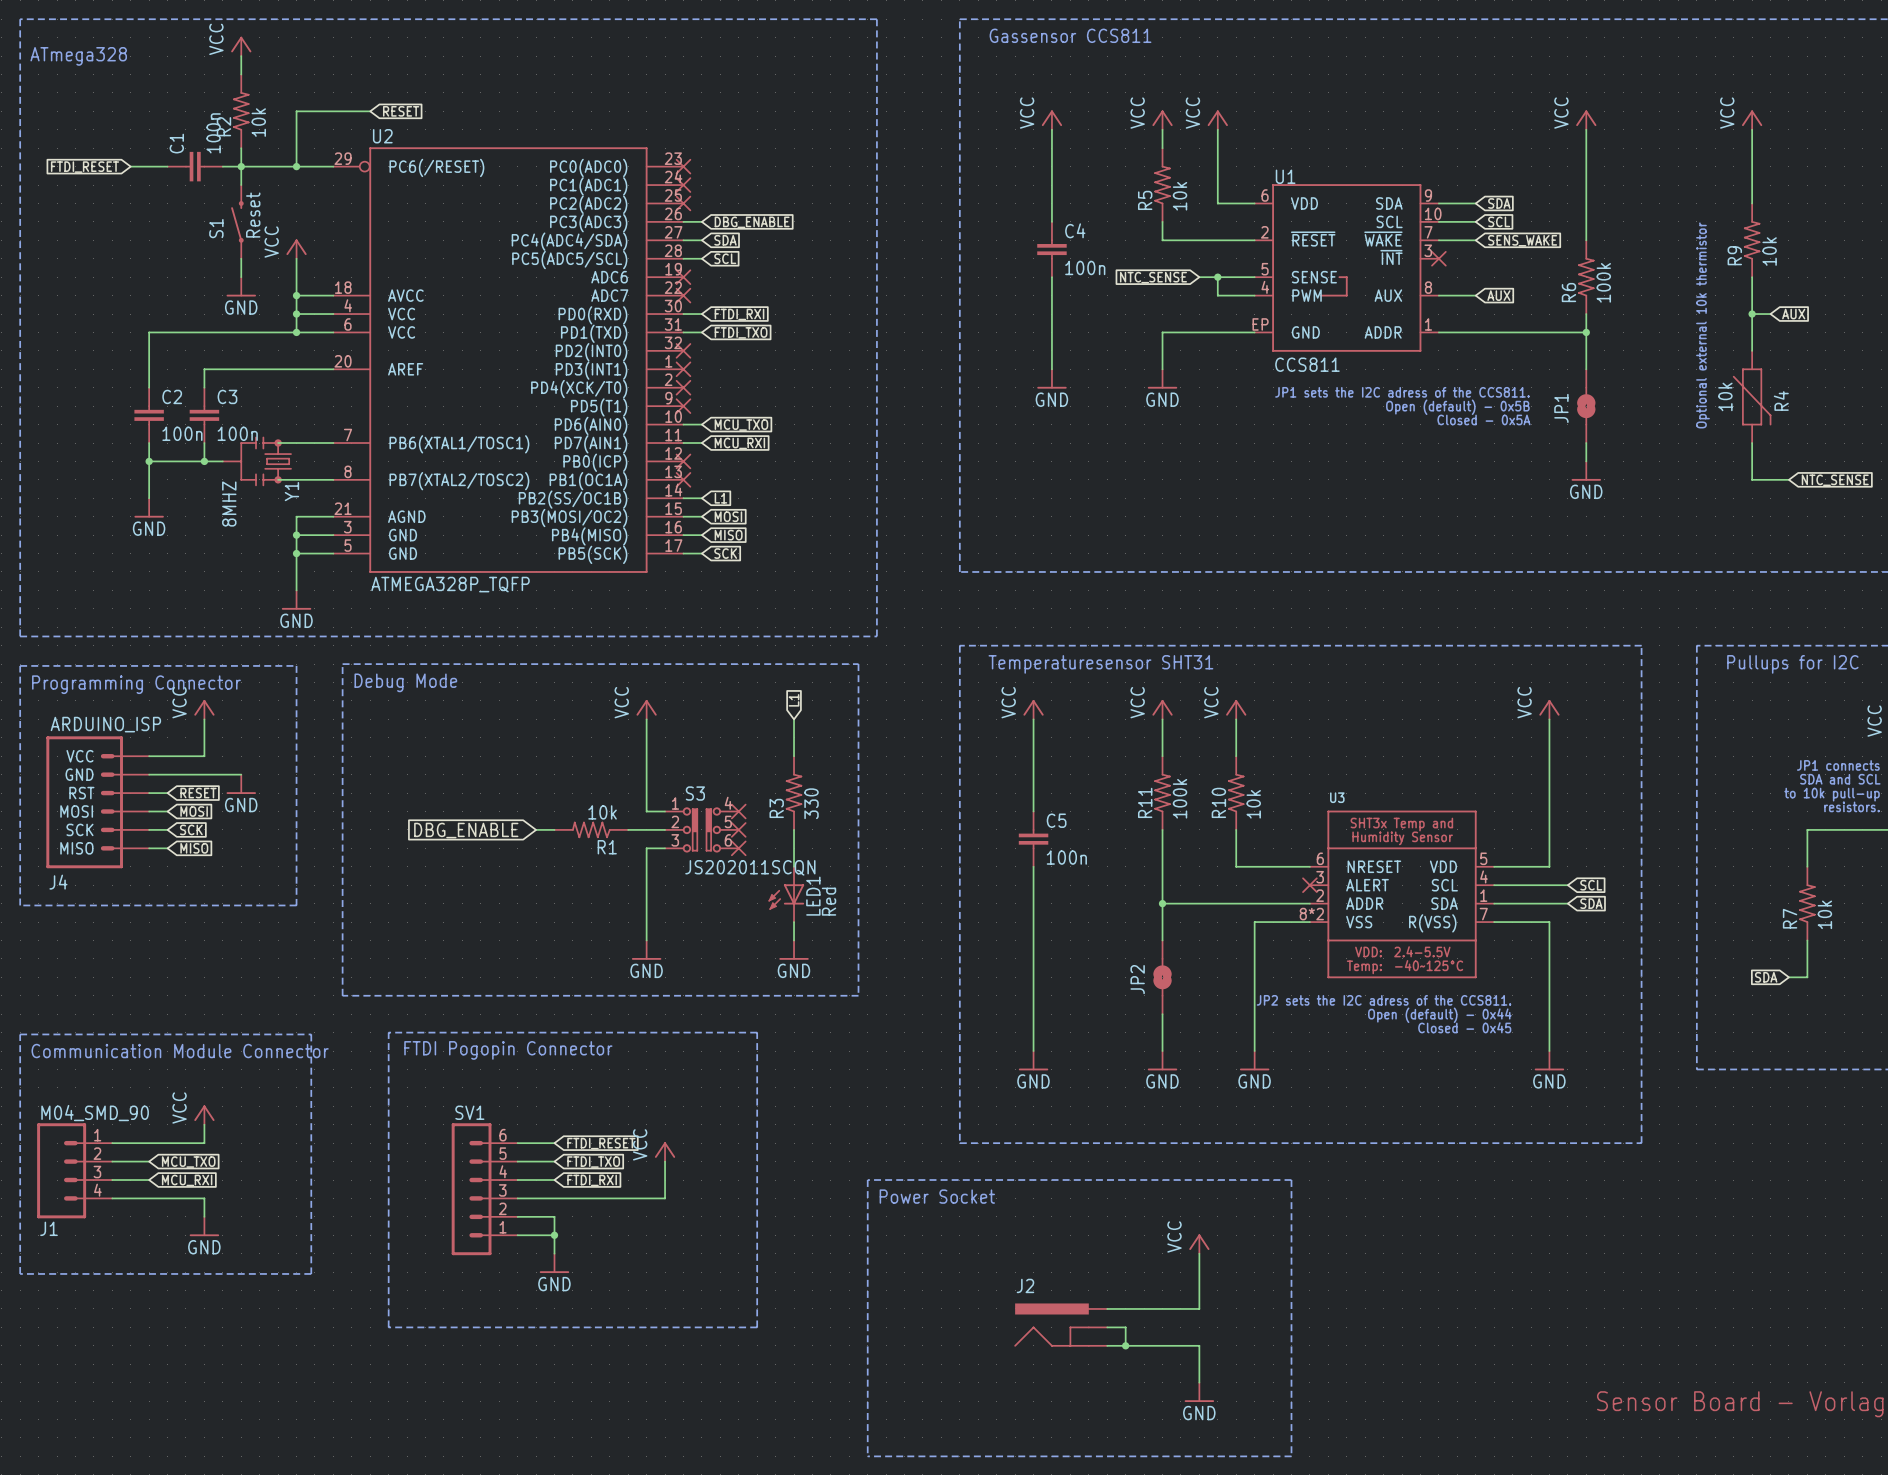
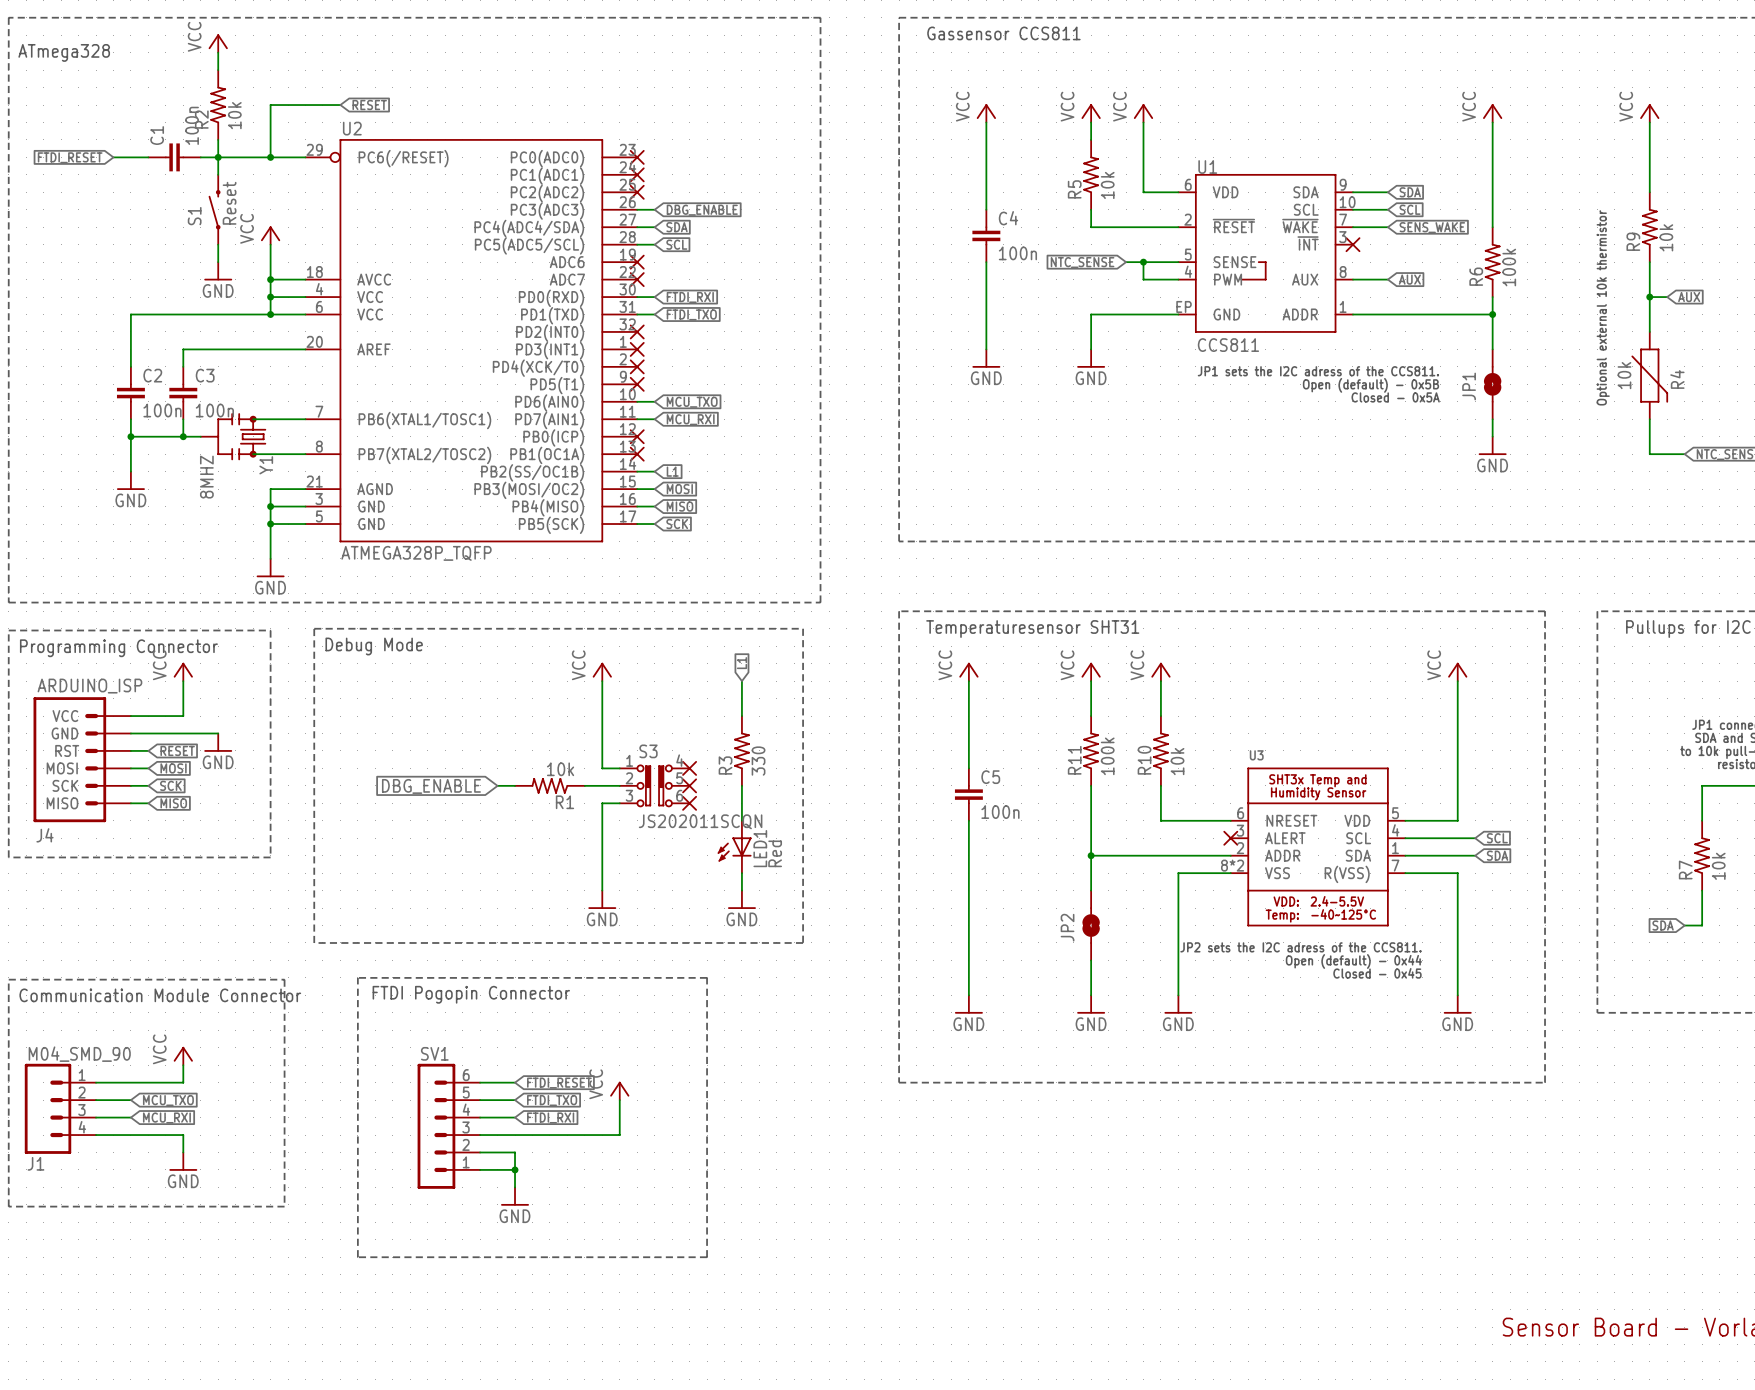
line: (867, 1180) (1291, 1180) (1291, 1456) (867, 1456) (867, 1180) -> none
text: Power Socket (937, 1196) -> none
power symbol: VCC (1199, 1244) -> none
wire: (1199, 1253) (1199, 1308) (1107, 1308) -> none
J2: (1060, 1324) -> none
wire: (1107, 1327) (1125, 1327) (1125, 1345) -> none
wire: (1107, 1345) (1199, 1345) (1199, 1382) -> none
junction: (1125, 1345) -> none
power symbol: GND (1199, 1392) -> none

